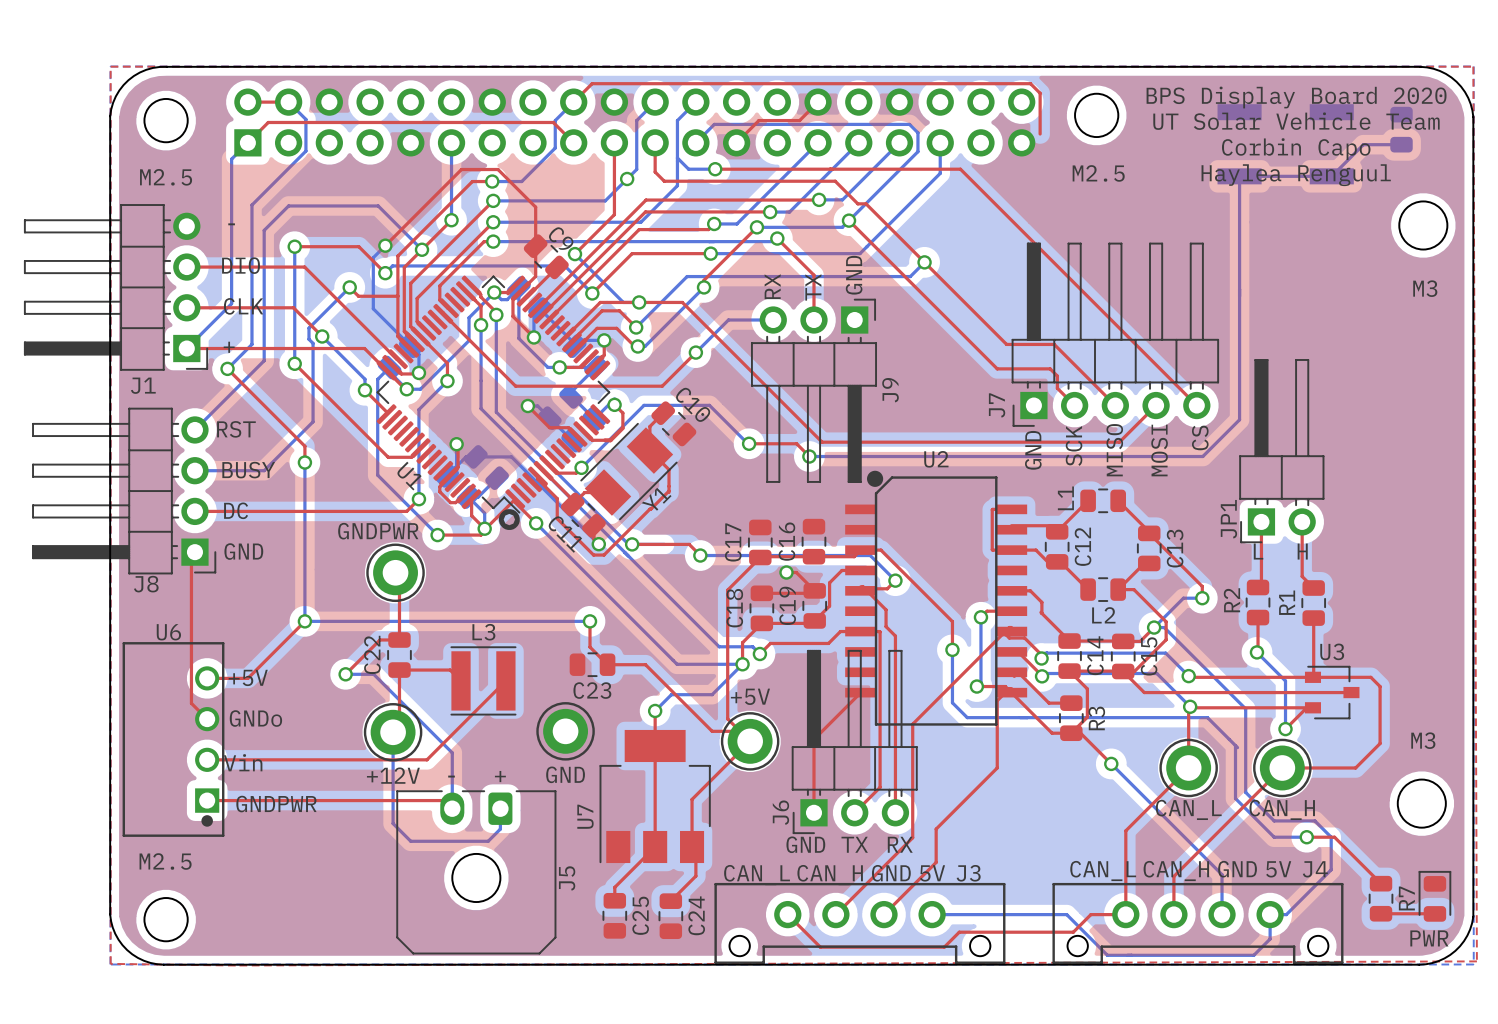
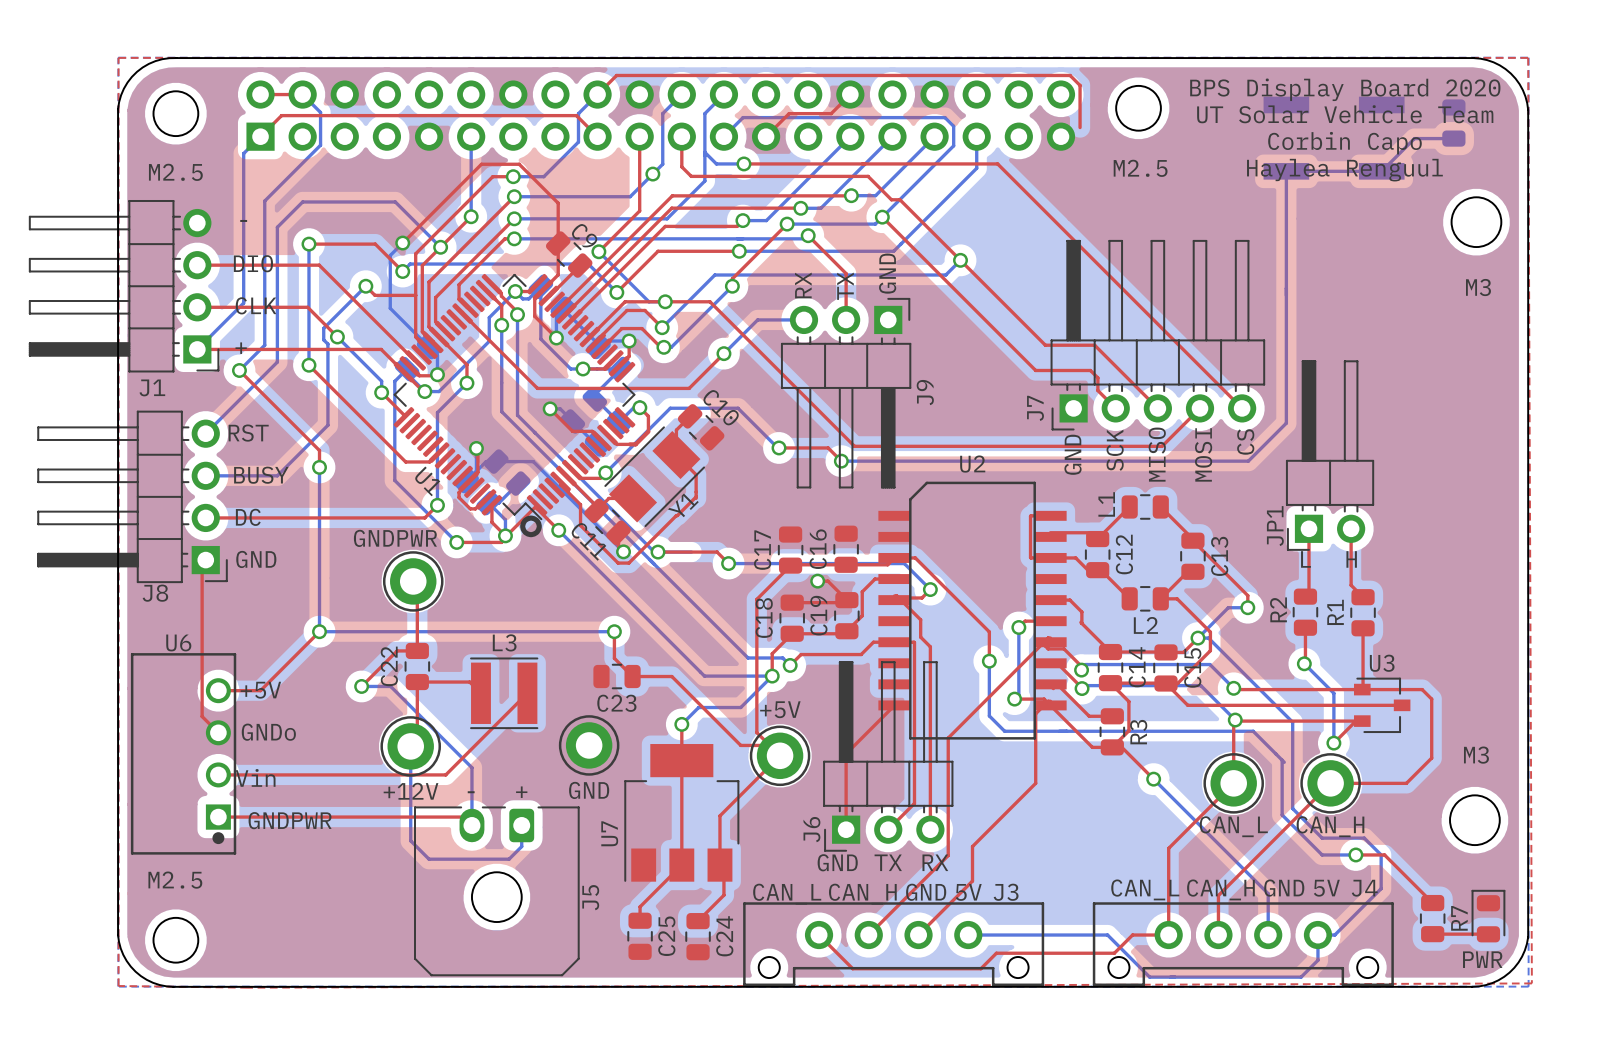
drawing: [867, 470, 884, 487] -> none

